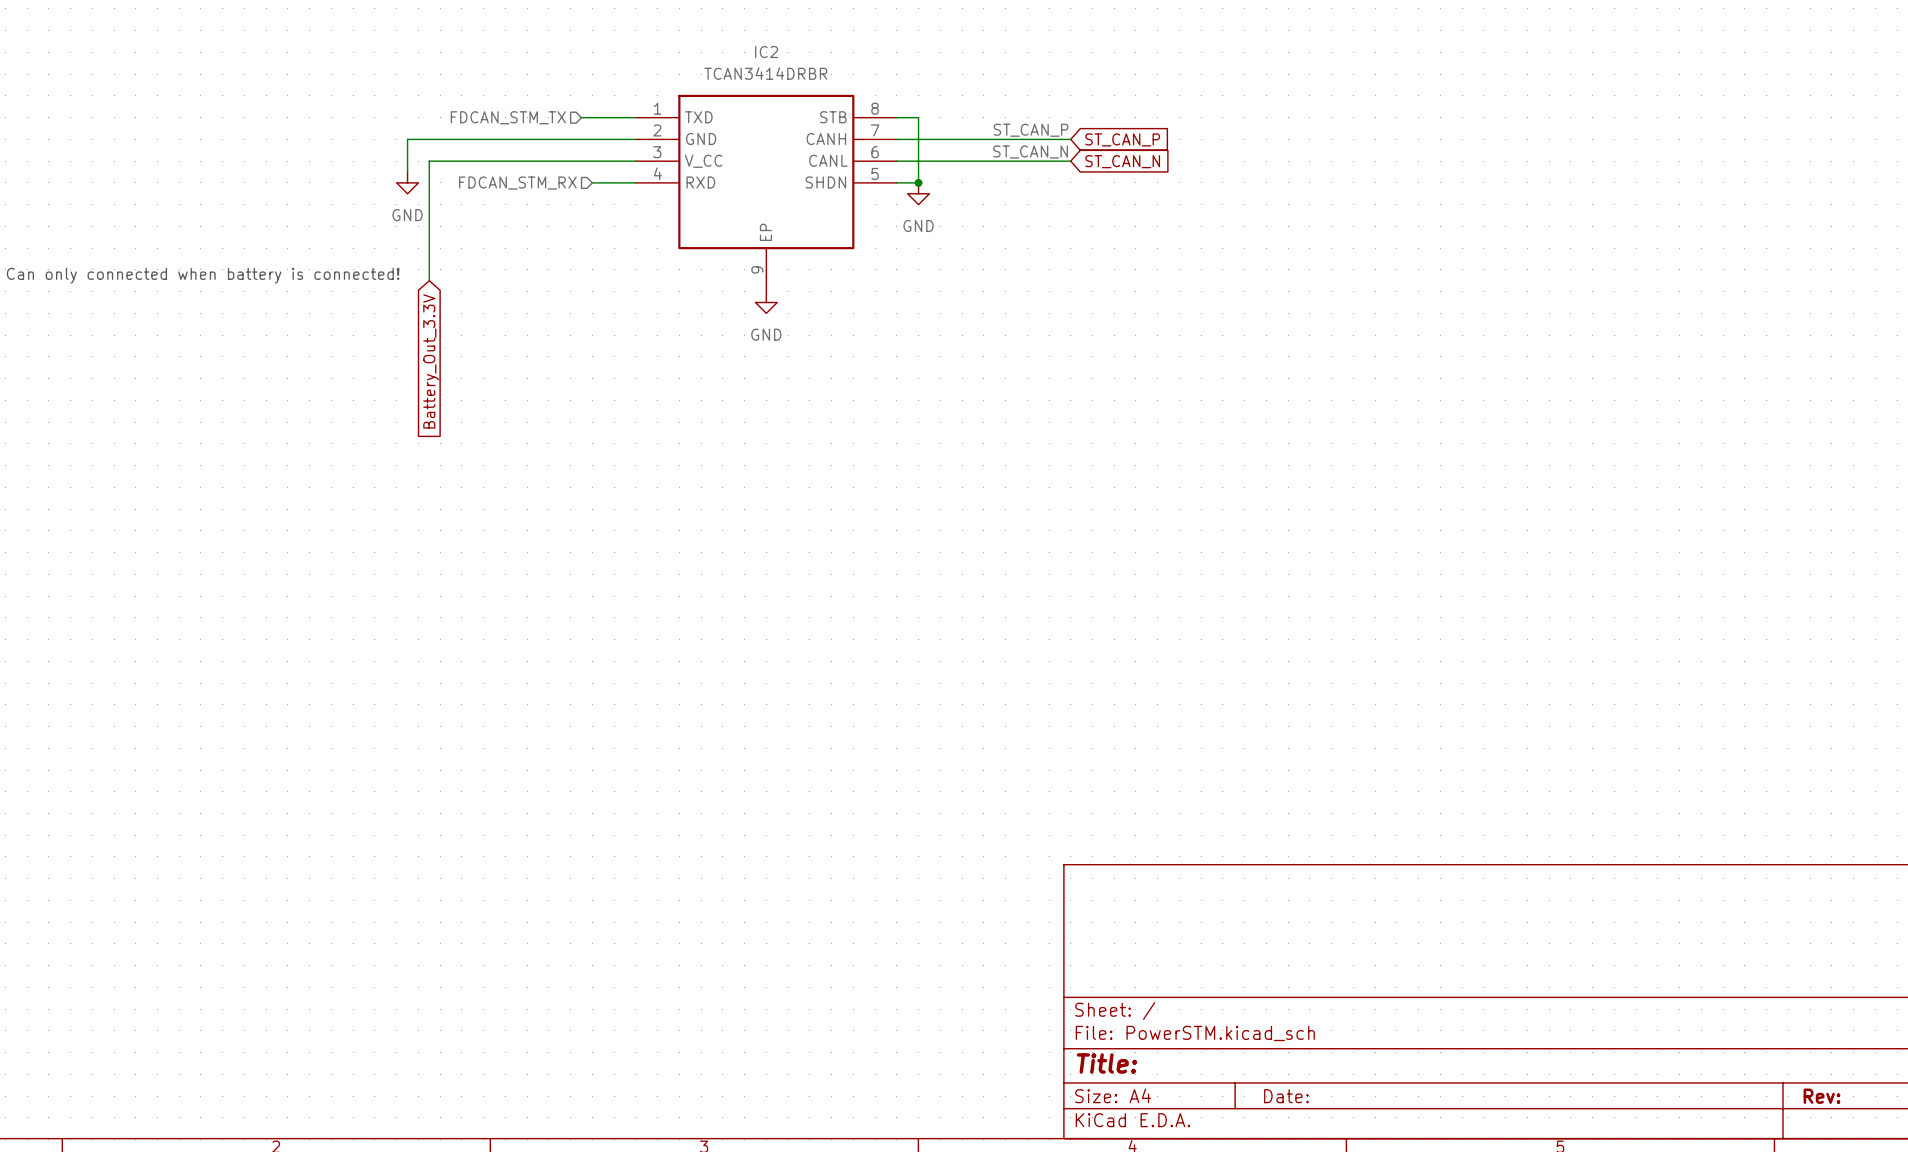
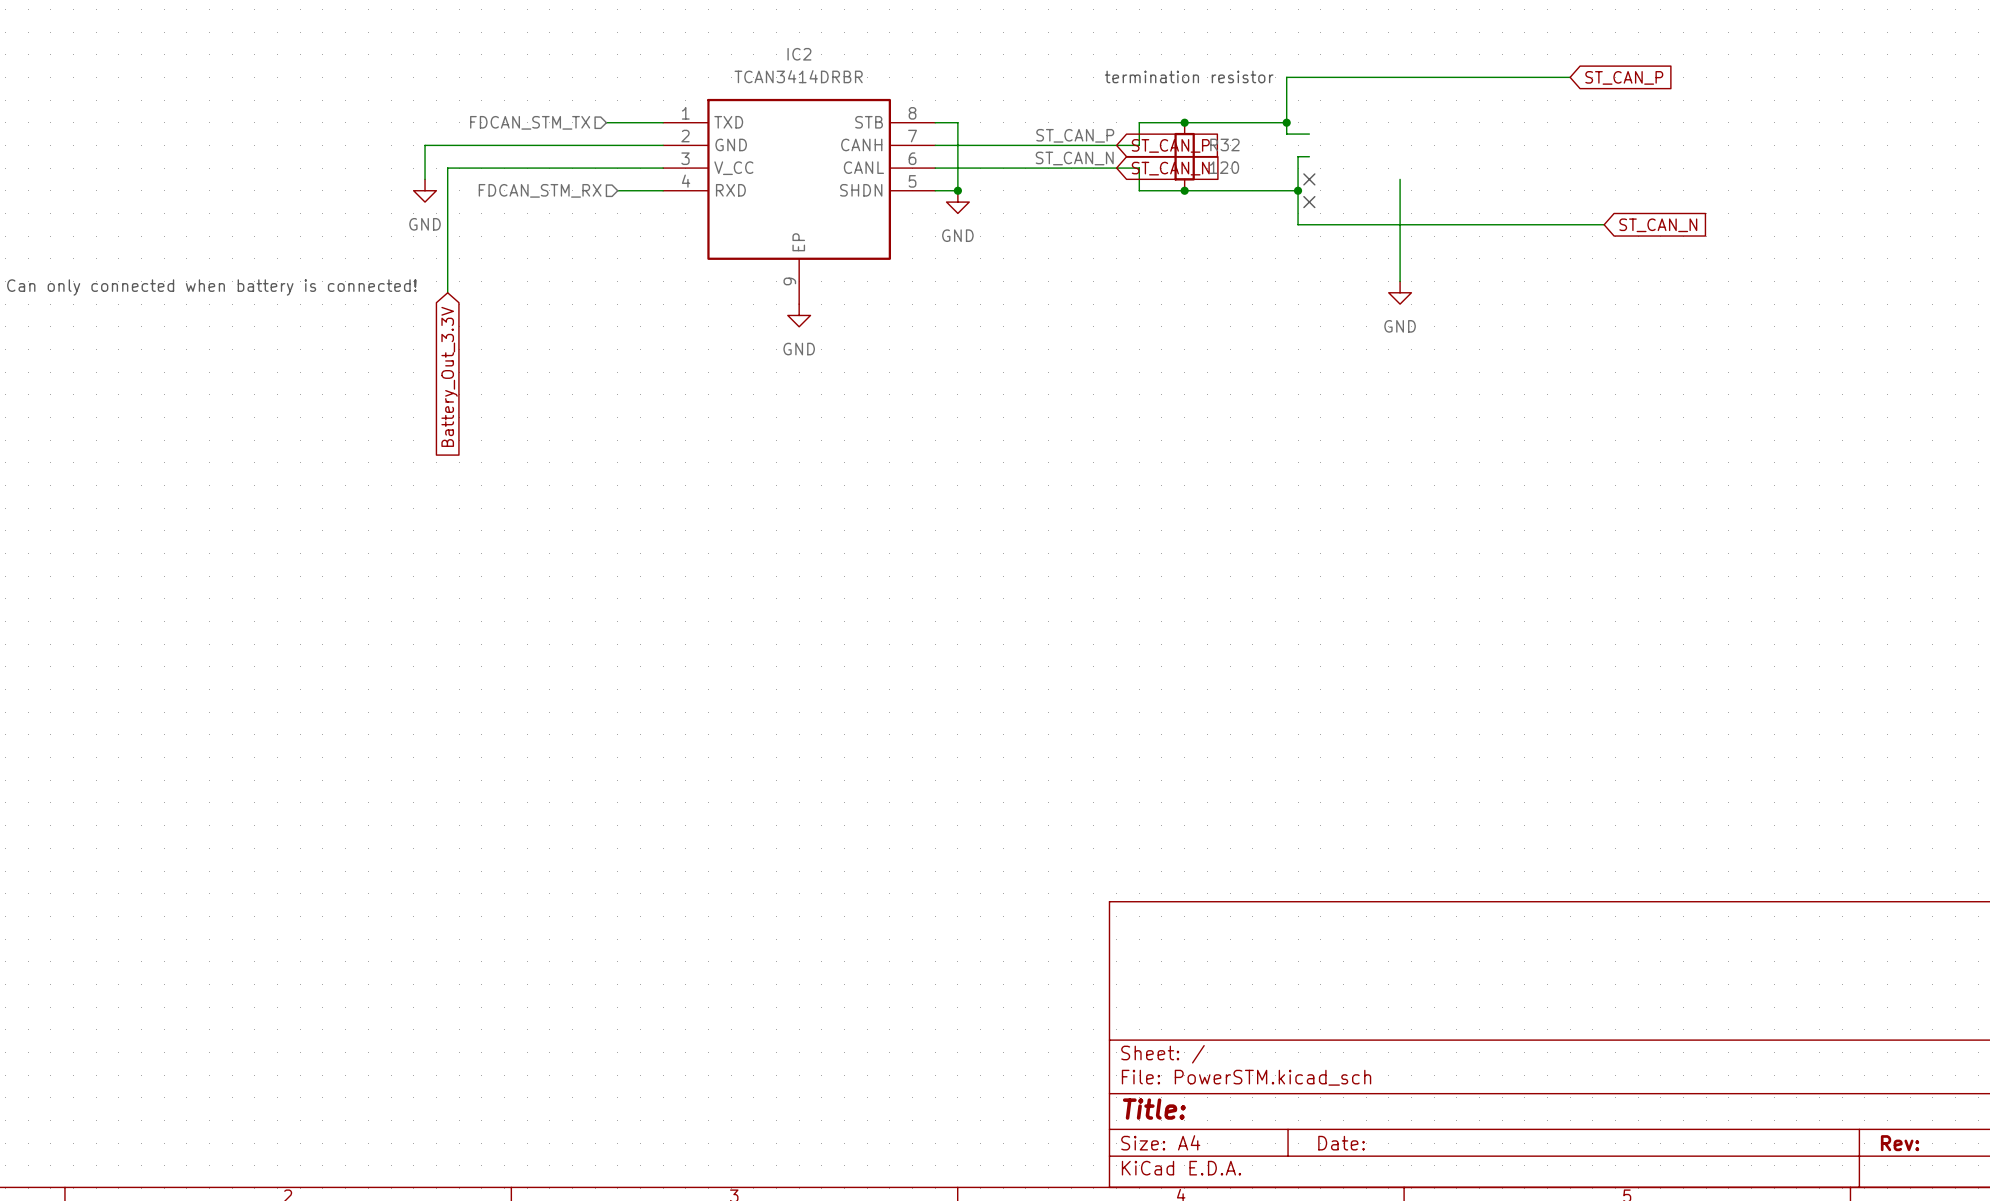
text: none -> termination resistor (1189, 76)
wire: none -> (1570, 77) (1286, 77) (1286, 134) (1309, 134)
global label: none -> ST_CAN_P (1624, 77)
junction: none -> (1184, 122)
wire: none -> (1286, 122) (1139, 122) (1139, 145) (1116, 145)
junction: none -> (1286, 122)
R32: none -> 120 (1184, 156)
wire: none -> (1309, 156) (1298, 156) (1298, 224) (1604, 224)
wire: none -> (1116, 168) (1139, 168) (1139, 190) (1298, 190)
no-connect mark: none -> (1309, 179)
wire: none -> (1400, 179) (1400, 281)
junction: none -> (1184, 190)
junction: none -> (1298, 190)
no-connect mark: none -> (1309, 202)
global label: none -> ST_CAN_N (1658, 225)
power symbol: none -> GND (1400, 292)

